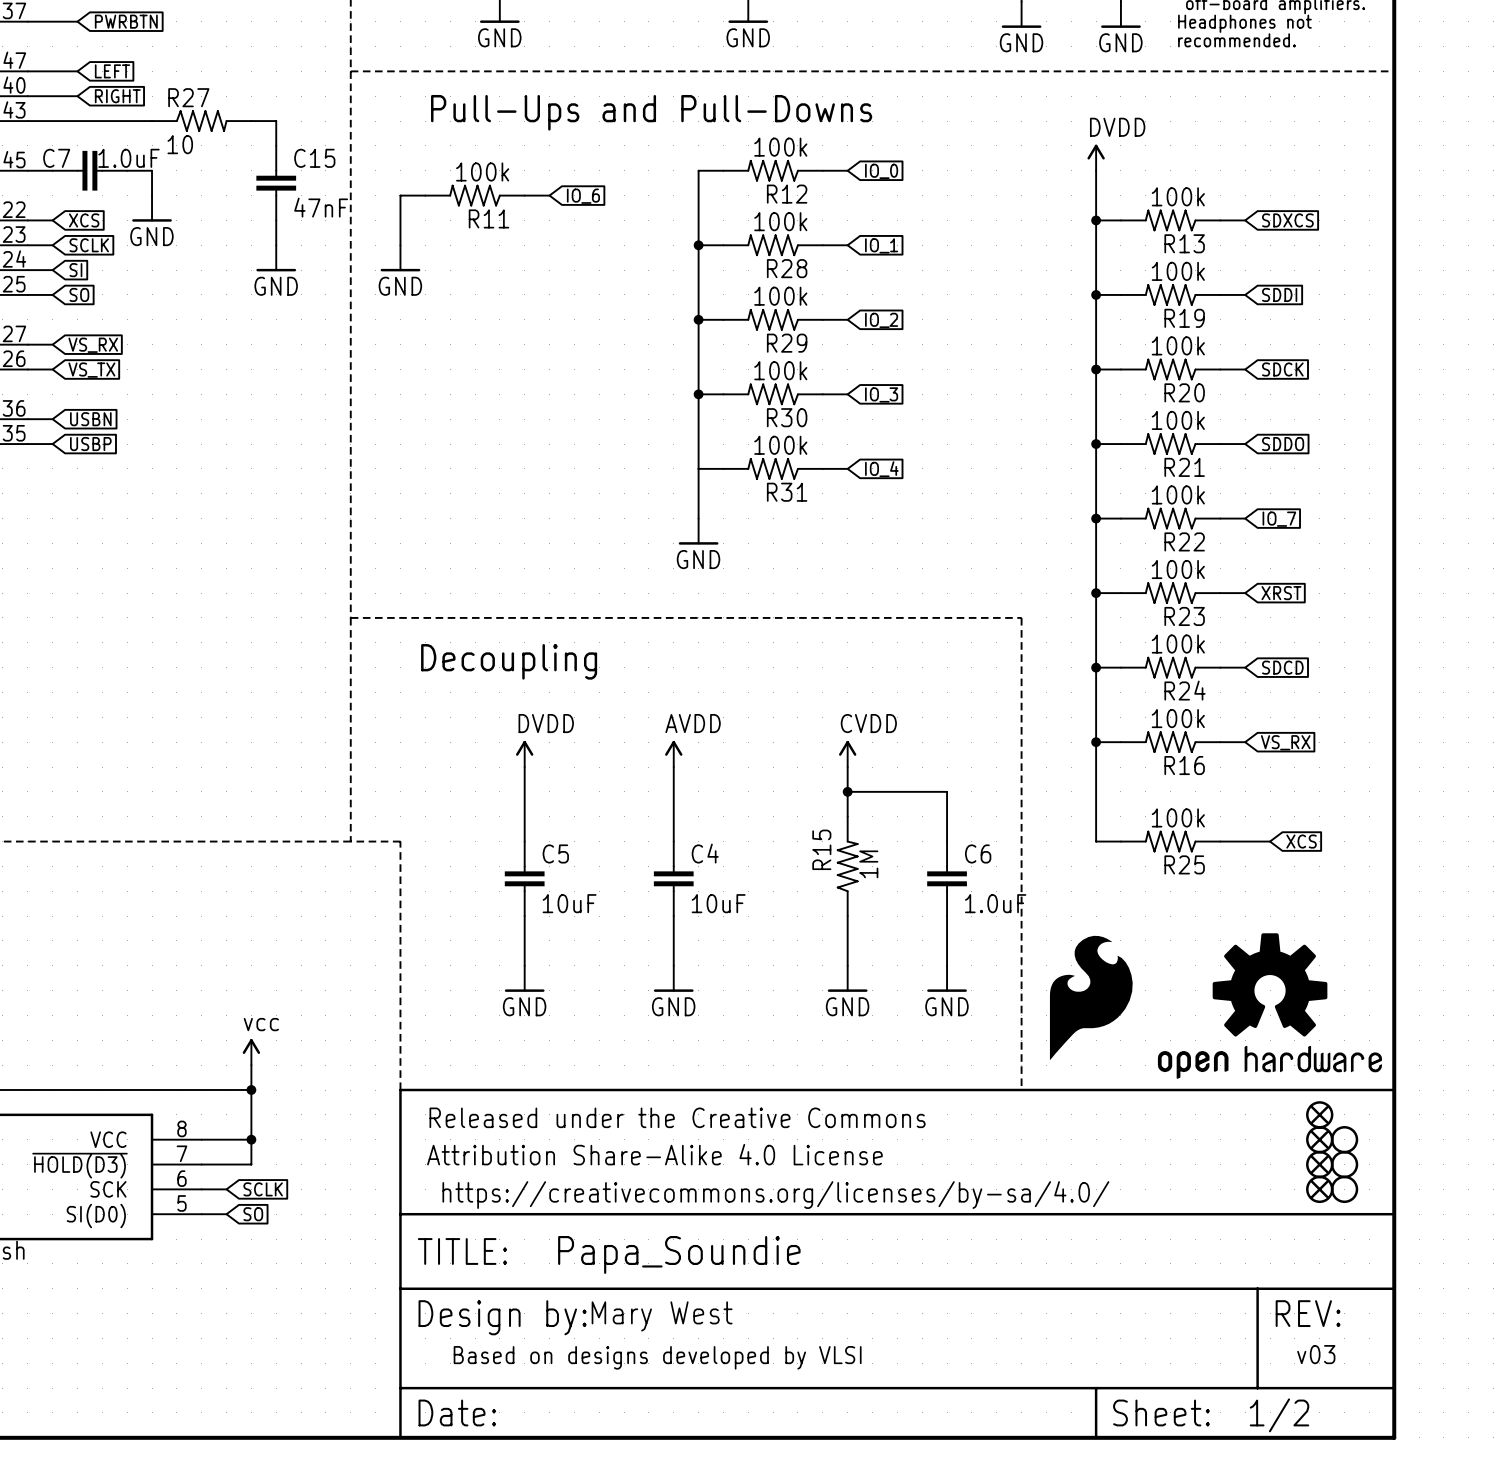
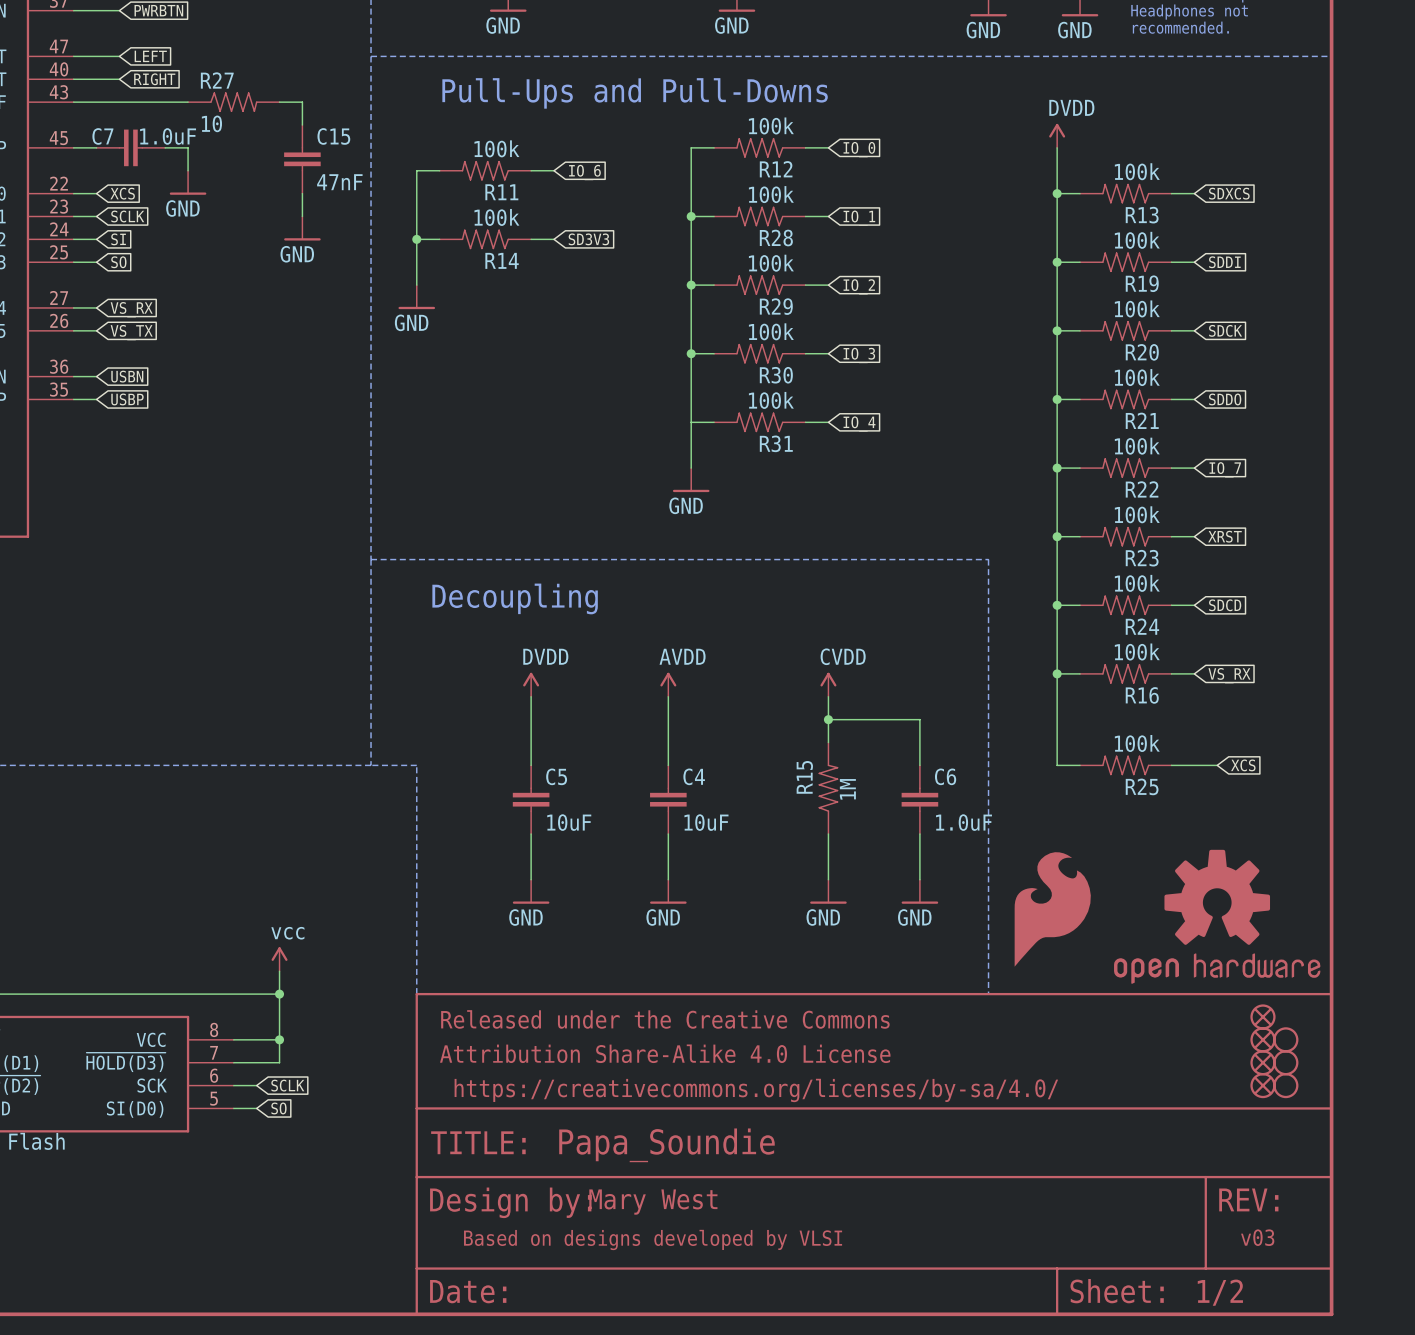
wire: none -> (416, 216) (416, 285)
power symbol position: GND (400, 258) -> GND (416, 297)
junction: none -> (416, 239)
R14: none -> 100k (485, 239)
wire: none -> (531, 239) (553, 239)
global label: none -> SD3V3 (588, 239)

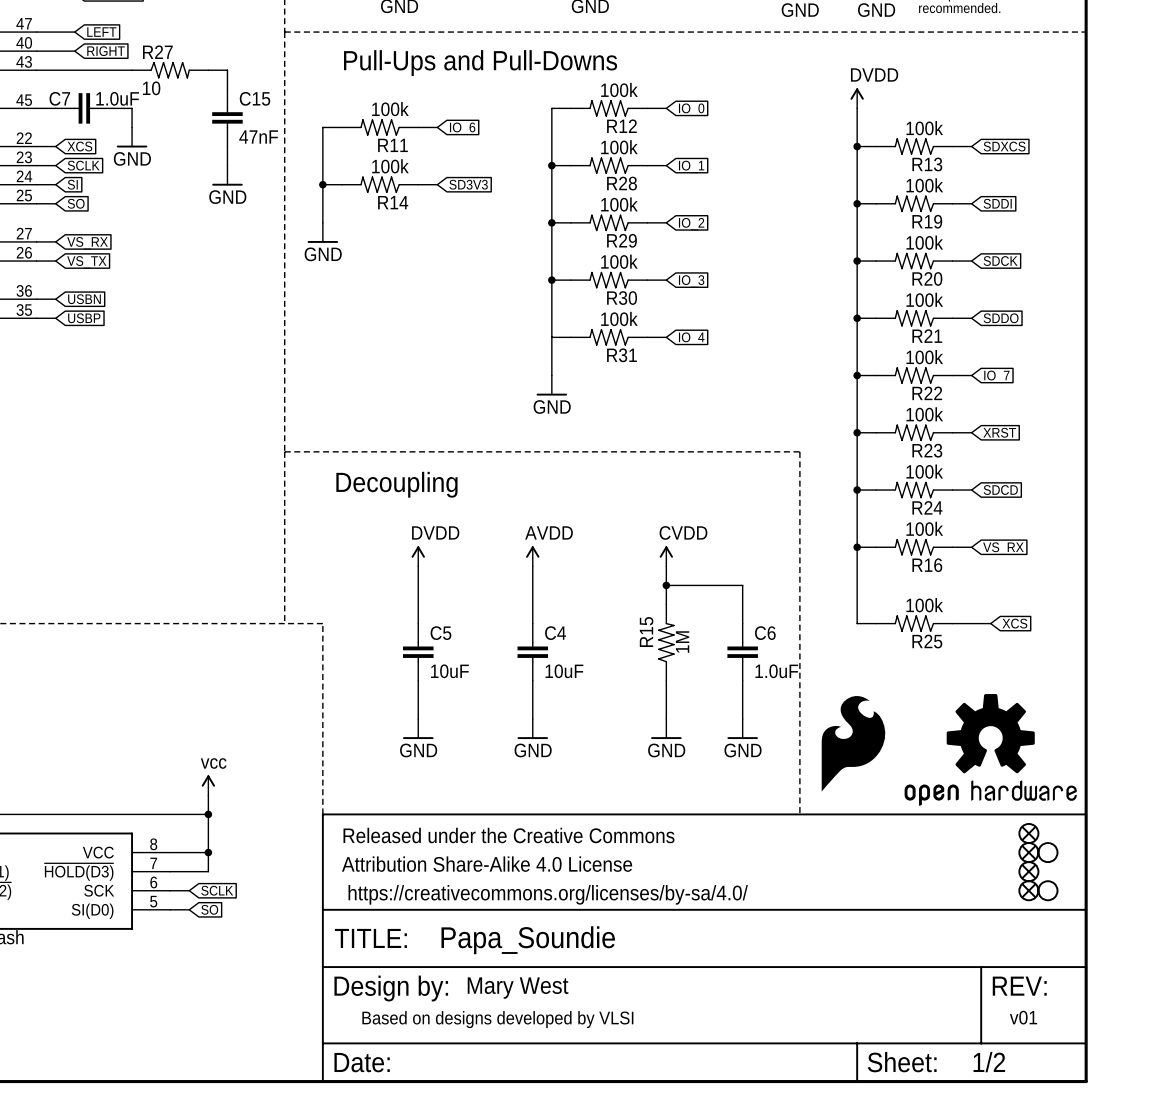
part: (1285, 1062) -> none
text: v03 (1257, 1237) -> v01 (1023, 1017)

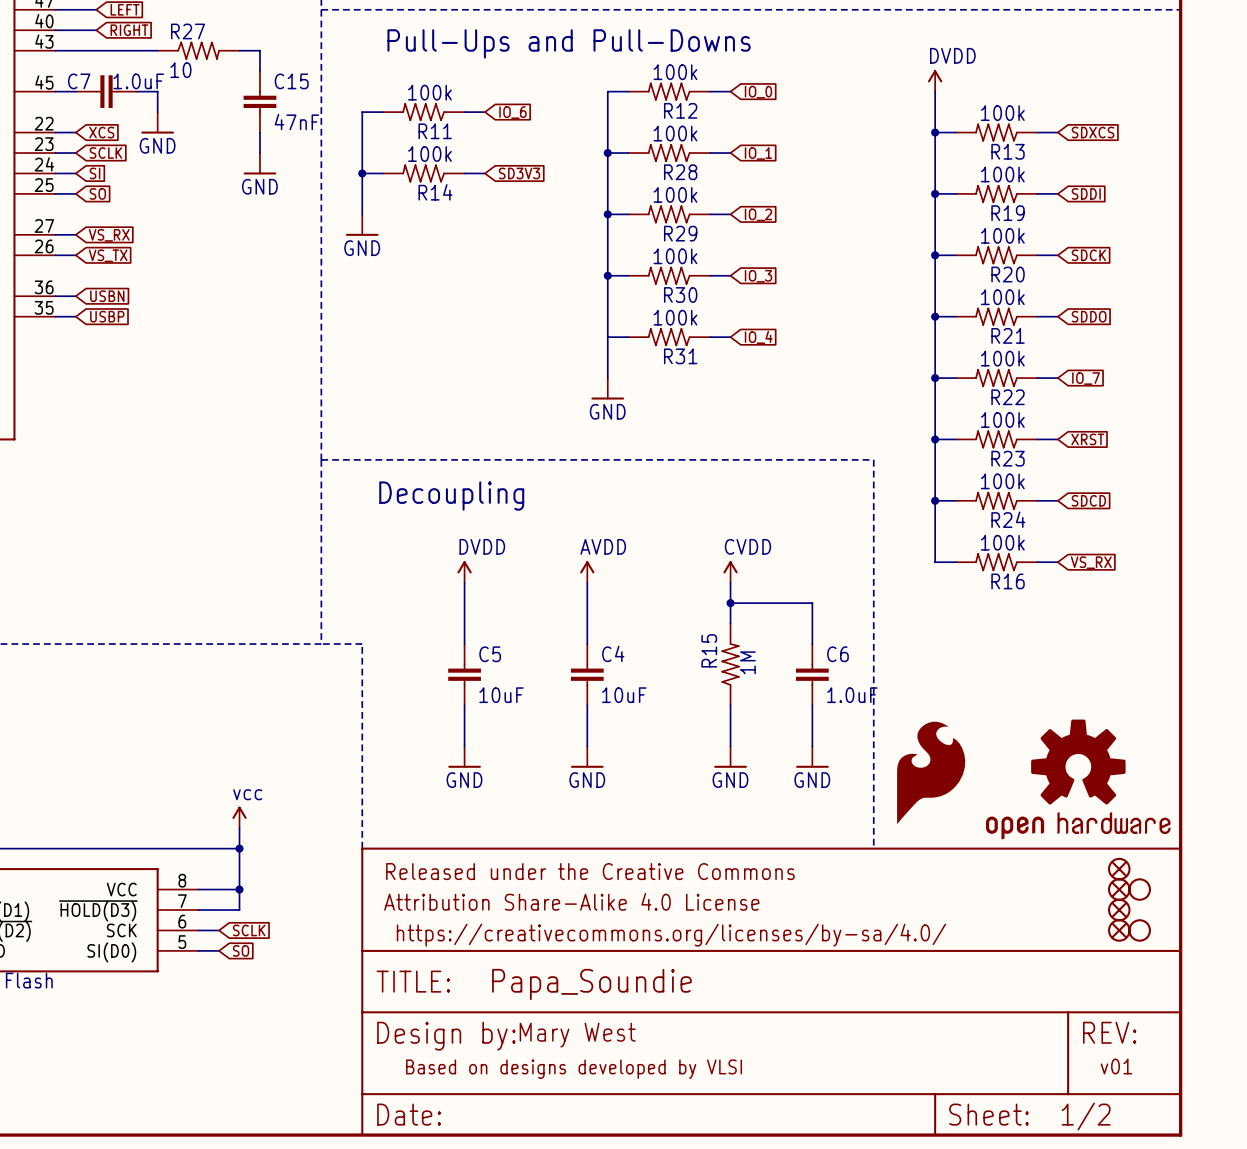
wire: (857, 547) (857, 623) (876, 623) -> none
junction: (857, 547) -> none
R25: 100k (914, 623) -> none
wire: (952, 623) (990, 623) -> none
global label: XCS (1014, 623) -> none

